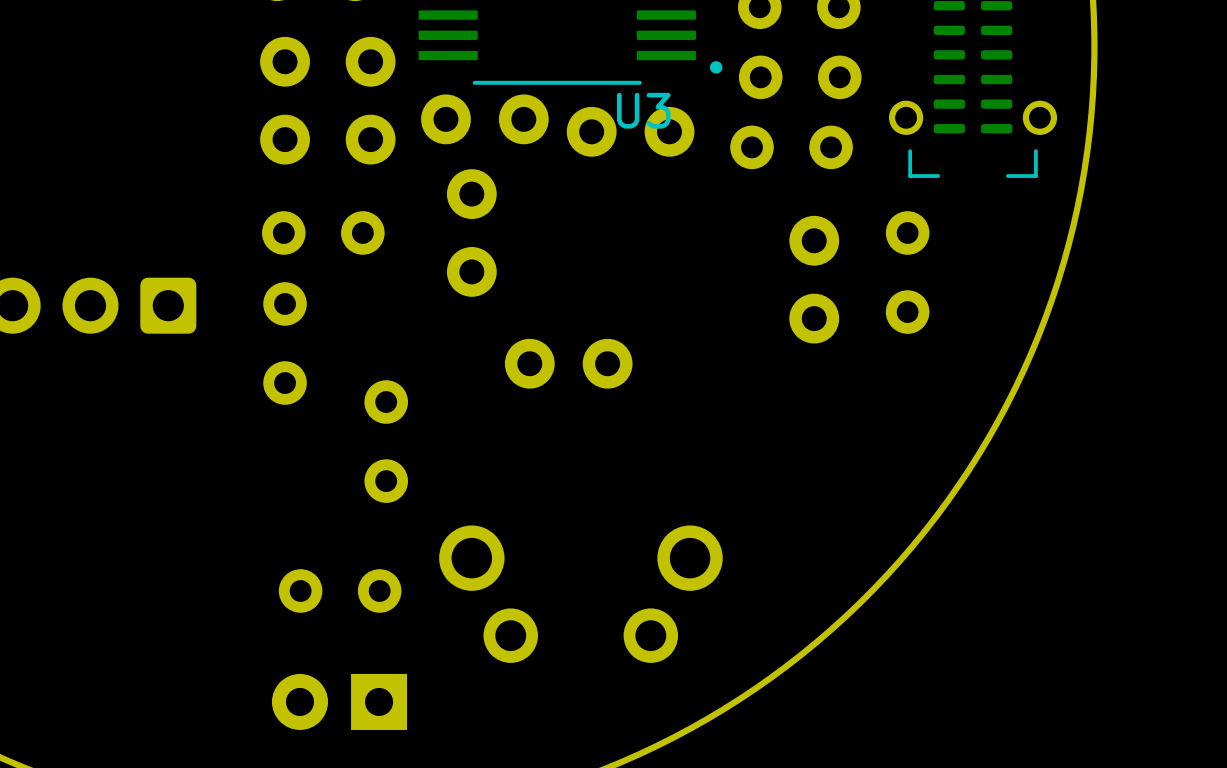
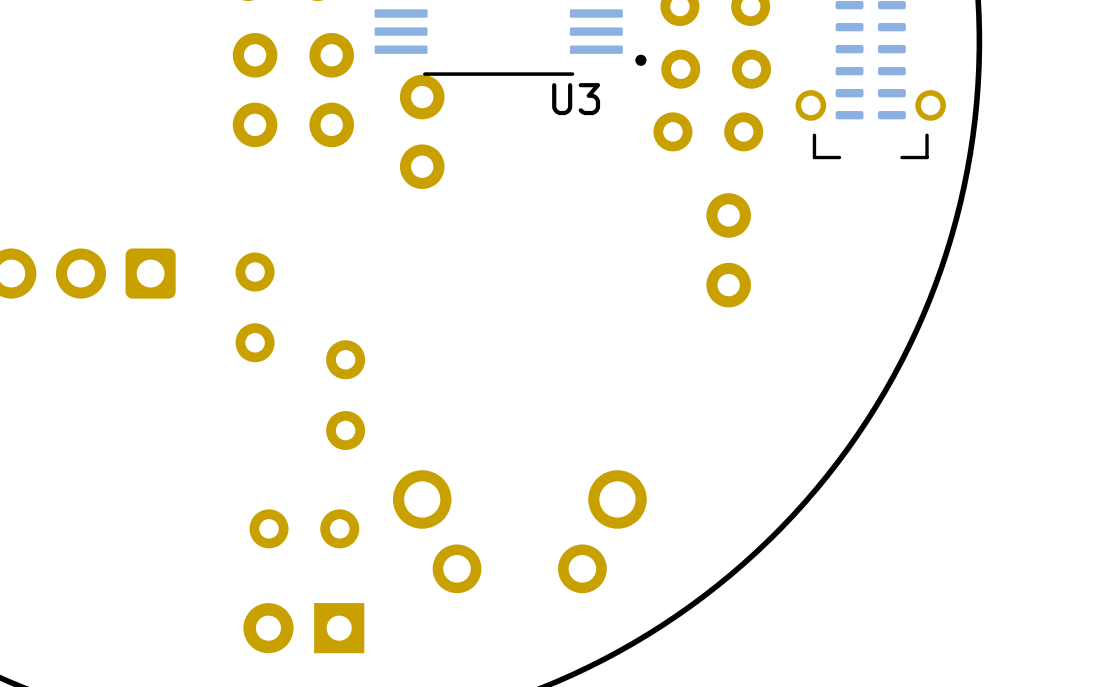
part rotation: 0° (484, 119) -> 90° clockwise (422, 131)
part: (630, 131) -> none
part: (323, 232) -> none
part: (471, 232) -> none
part: (907, 272) -> none
part: (568, 363) -> none

